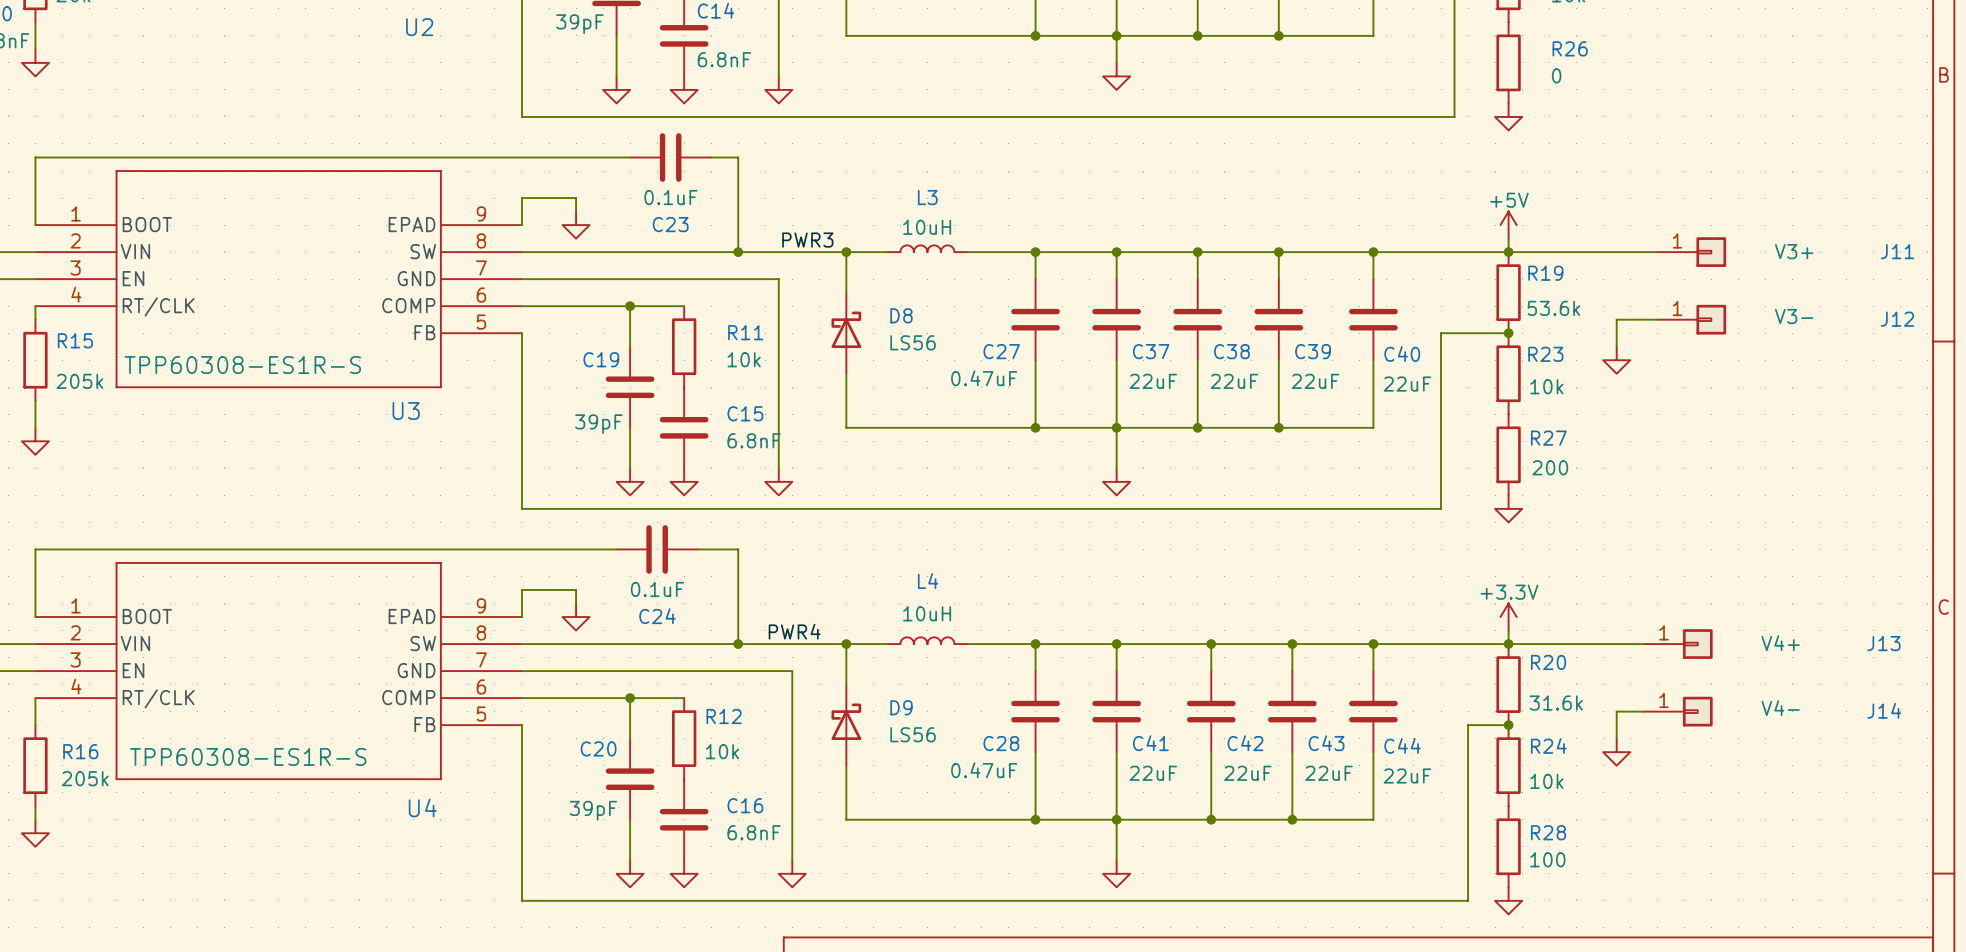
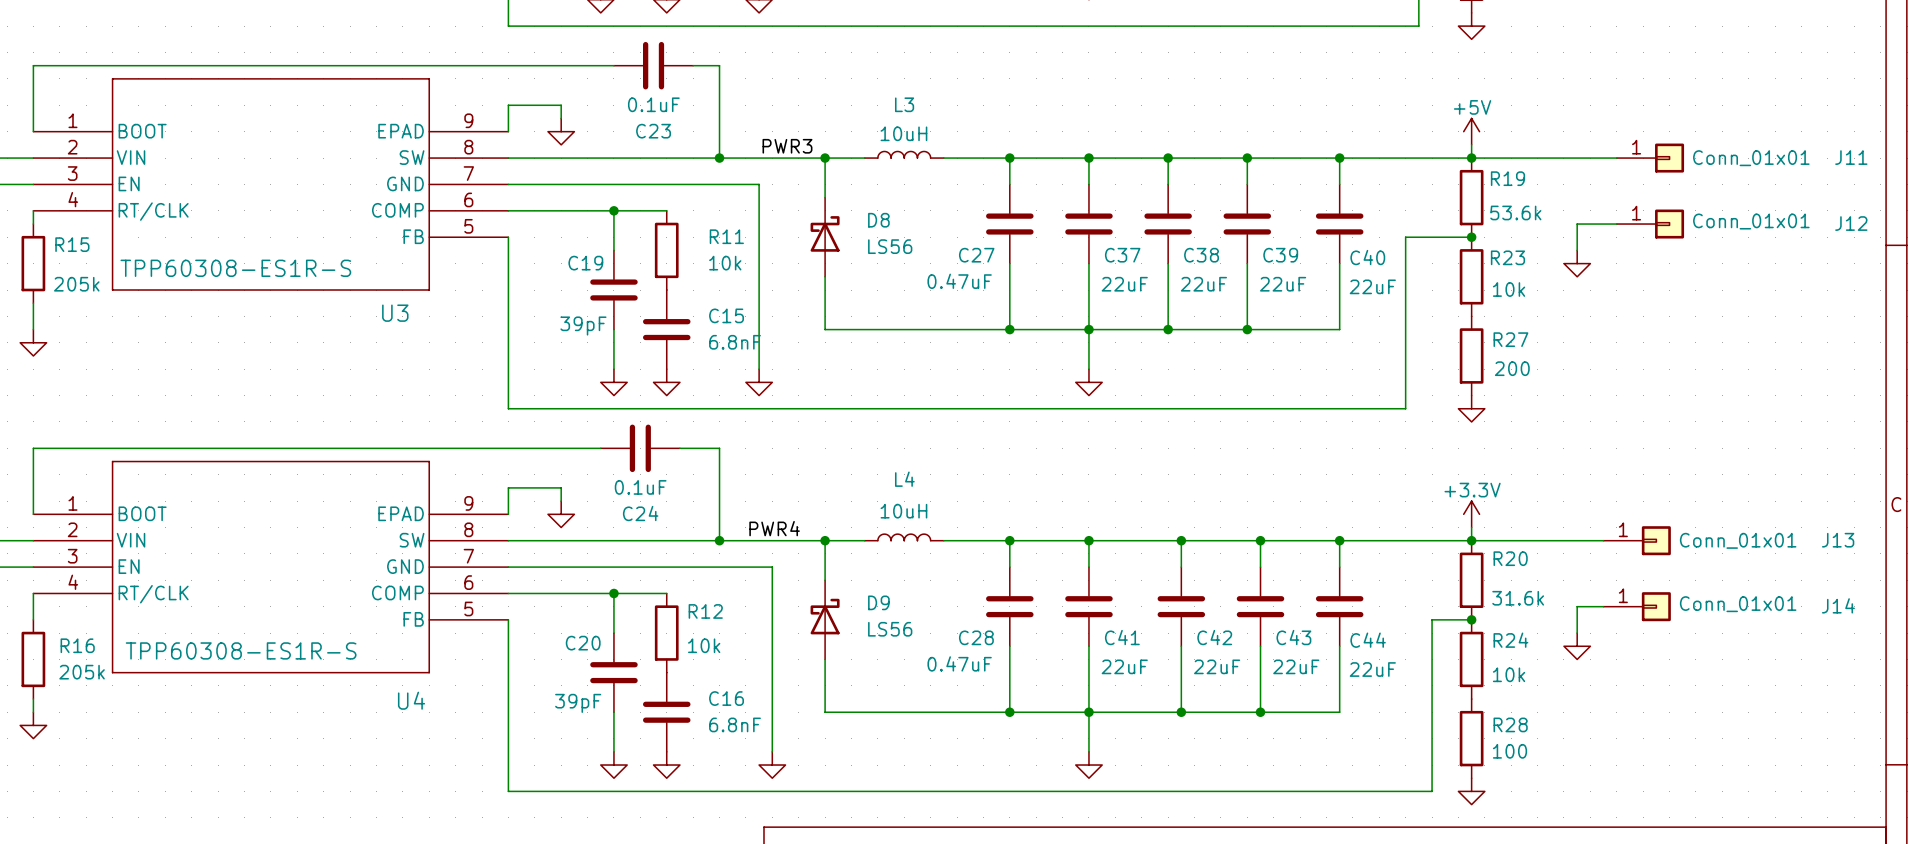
J11 value: V3+ (1794, 251) -> Conn_01x01 (1751, 158)
J12 value: V3- (1794, 316) -> Conn_01x01 (1751, 221)
J13 value: V4+ (1780, 643) -> Conn_01x01 (1738, 540)
J14 value: V4- (1780, 708) -> Conn_01x01 (1738, 604)

